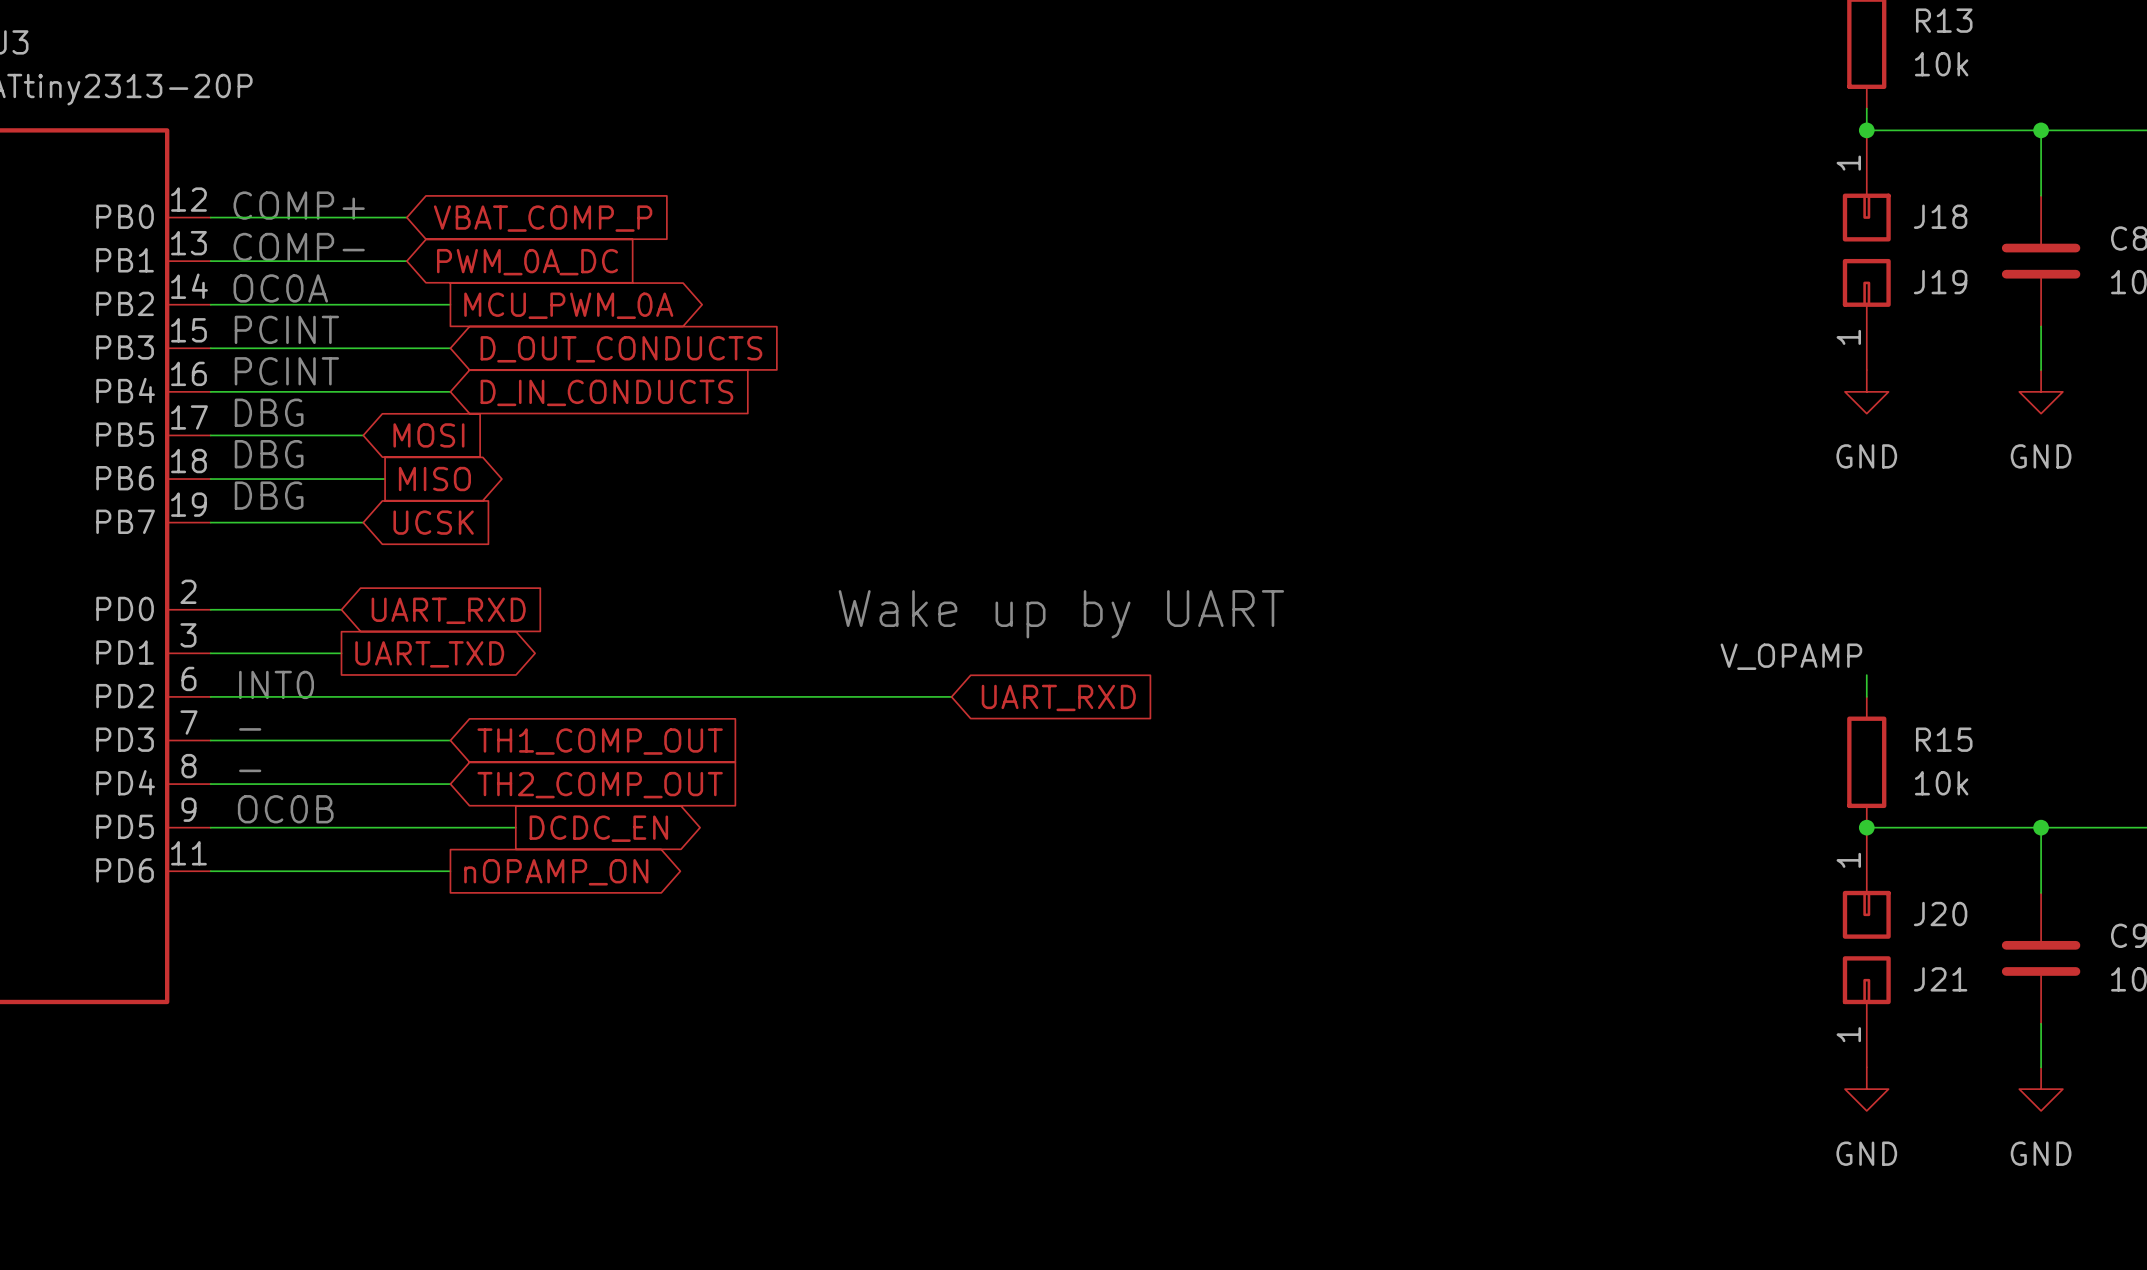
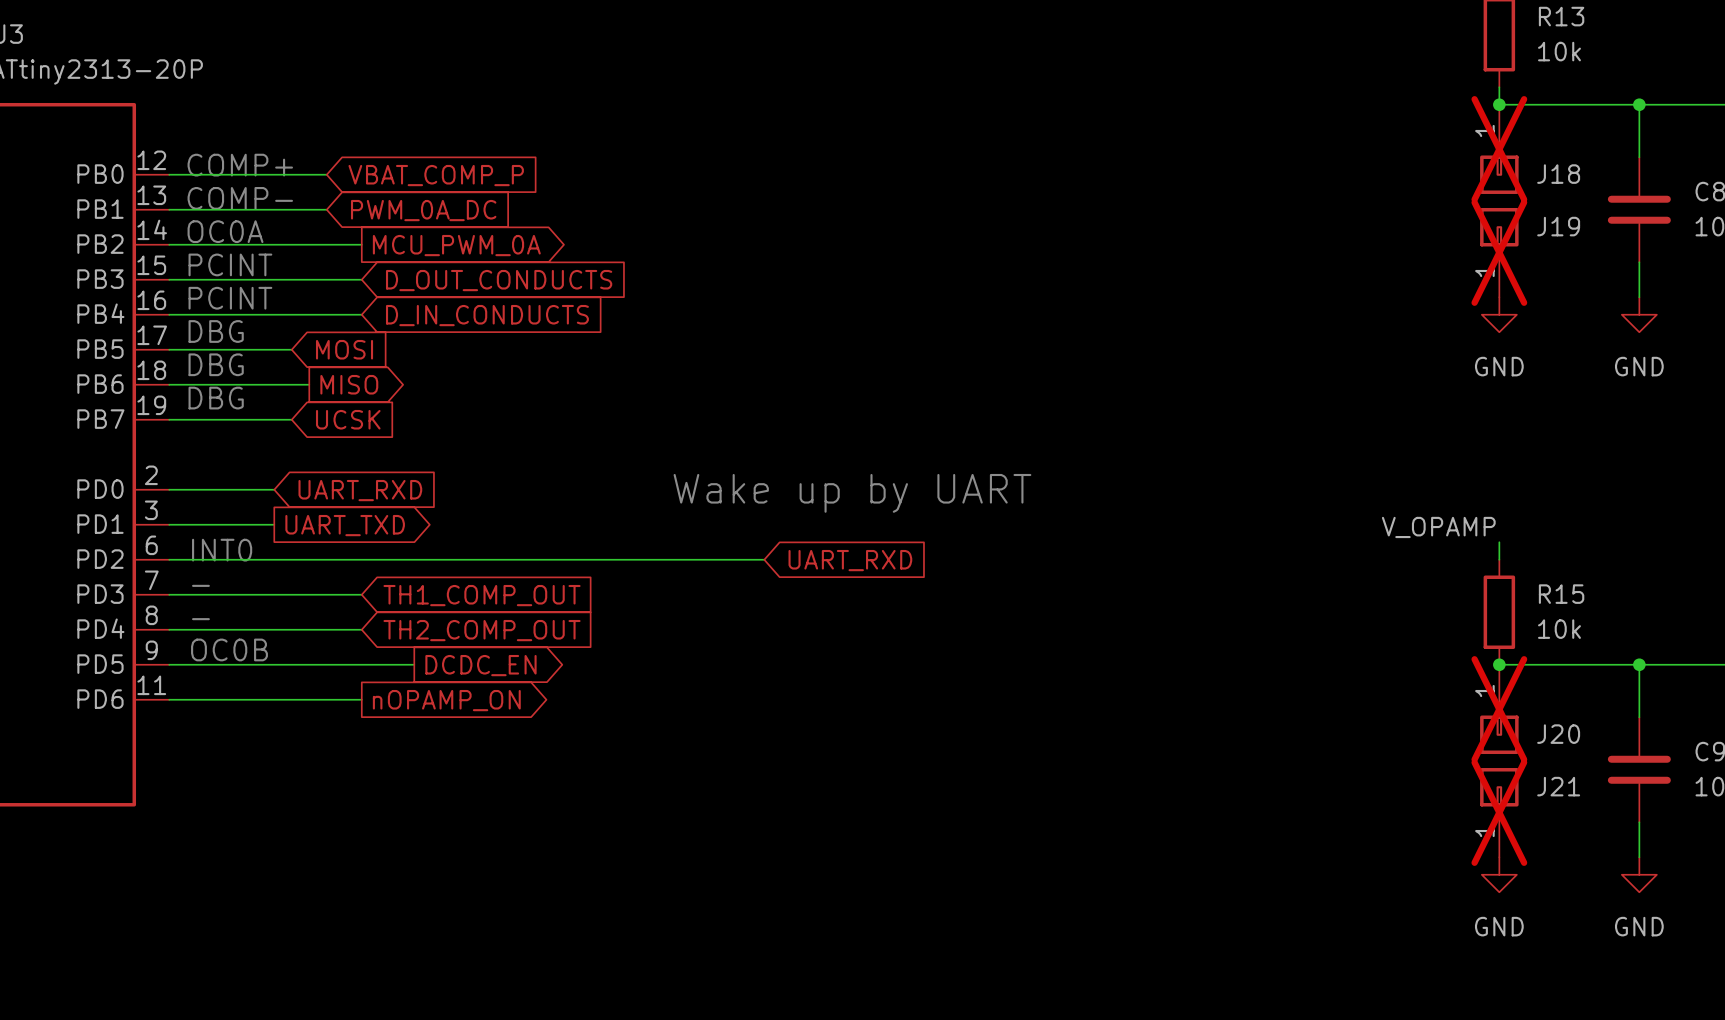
J18 do-not-place cross: none -> (1499, 149)
J19 do-not-place cross: none -> (1499, 252)
J20 do-not-place cross: none -> (1499, 709)
J21 do-not-place cross: none -> (1499, 812)

